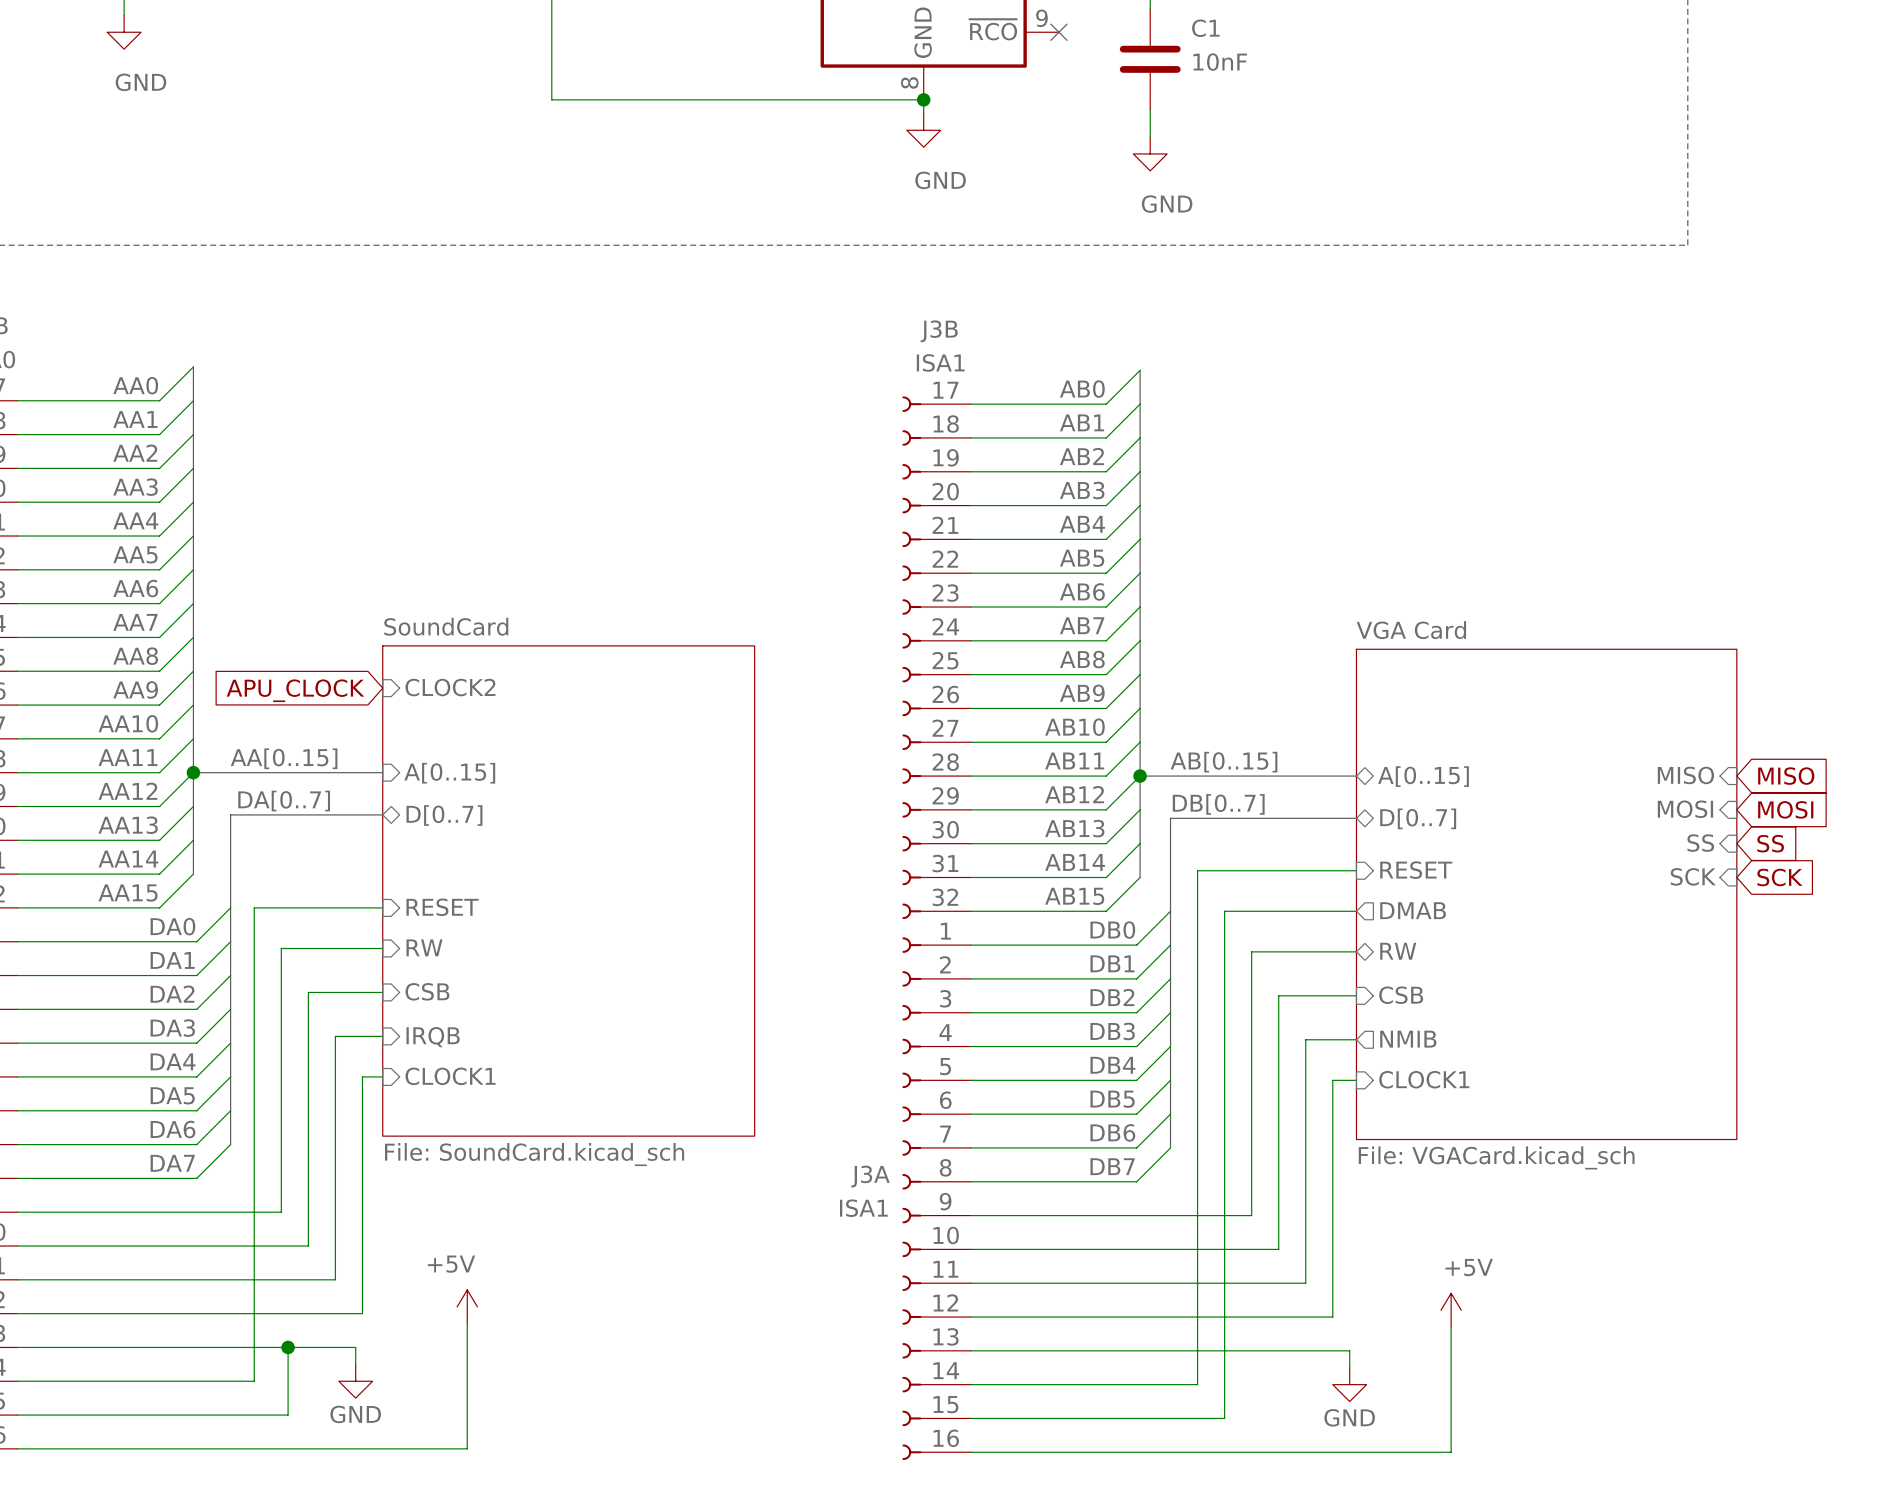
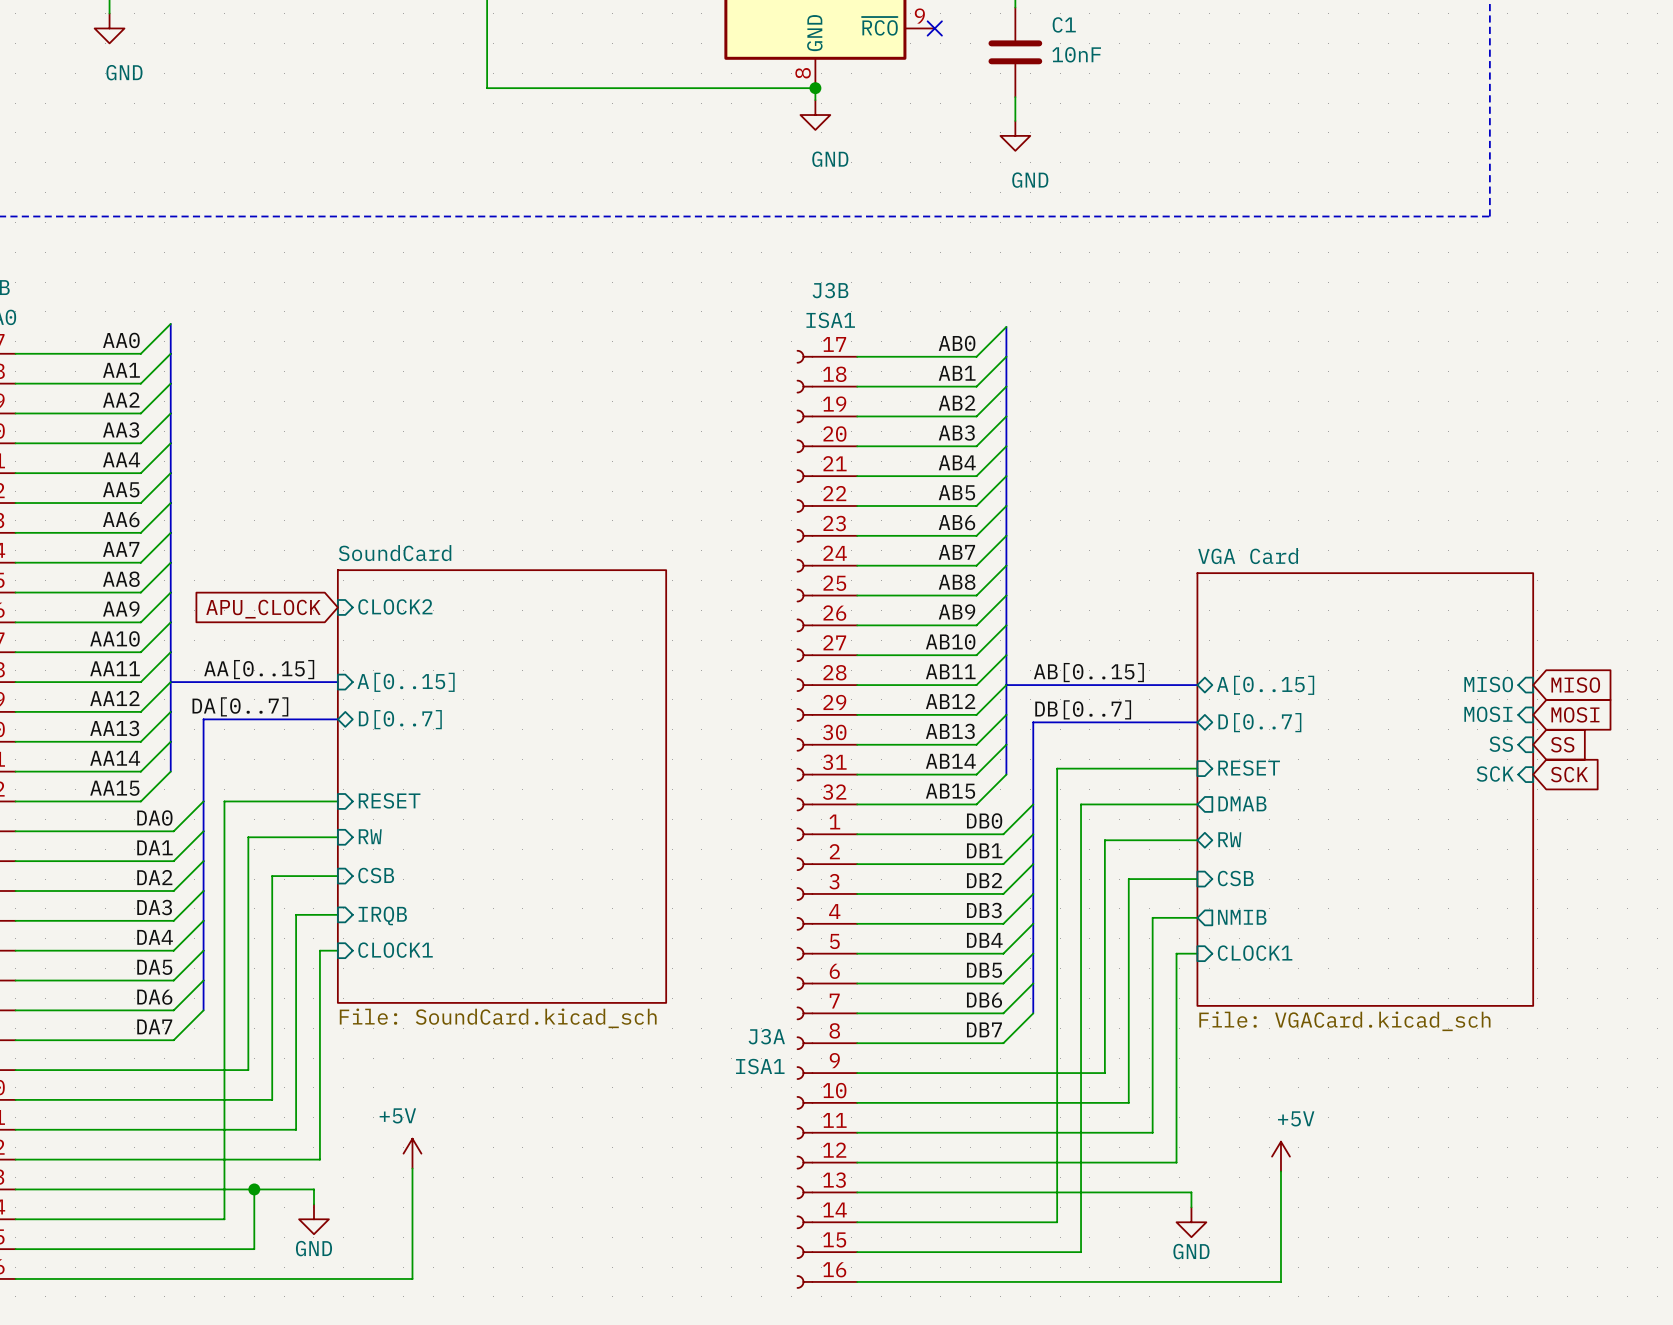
junction: (193, 772) -> none
junction: (1140, 776) -> none

